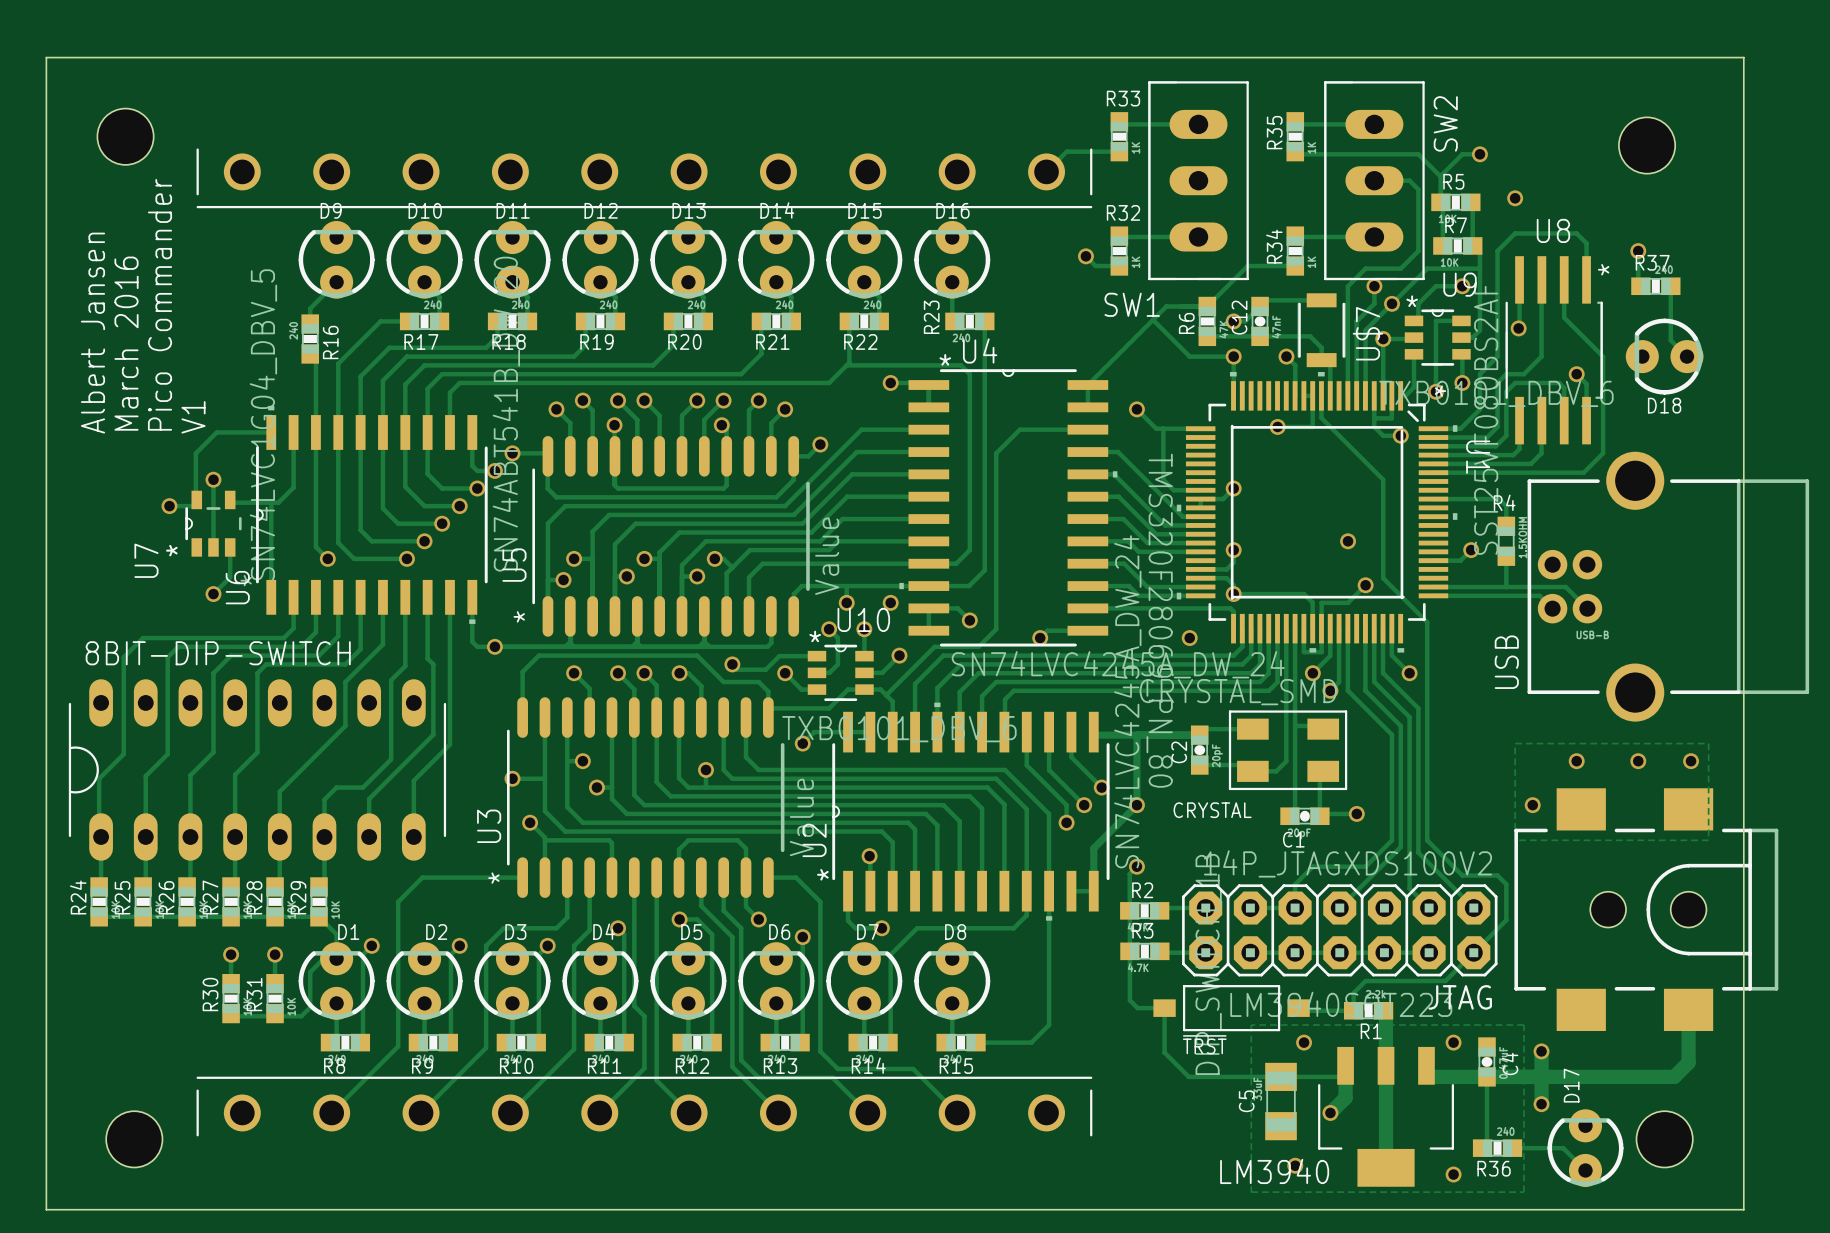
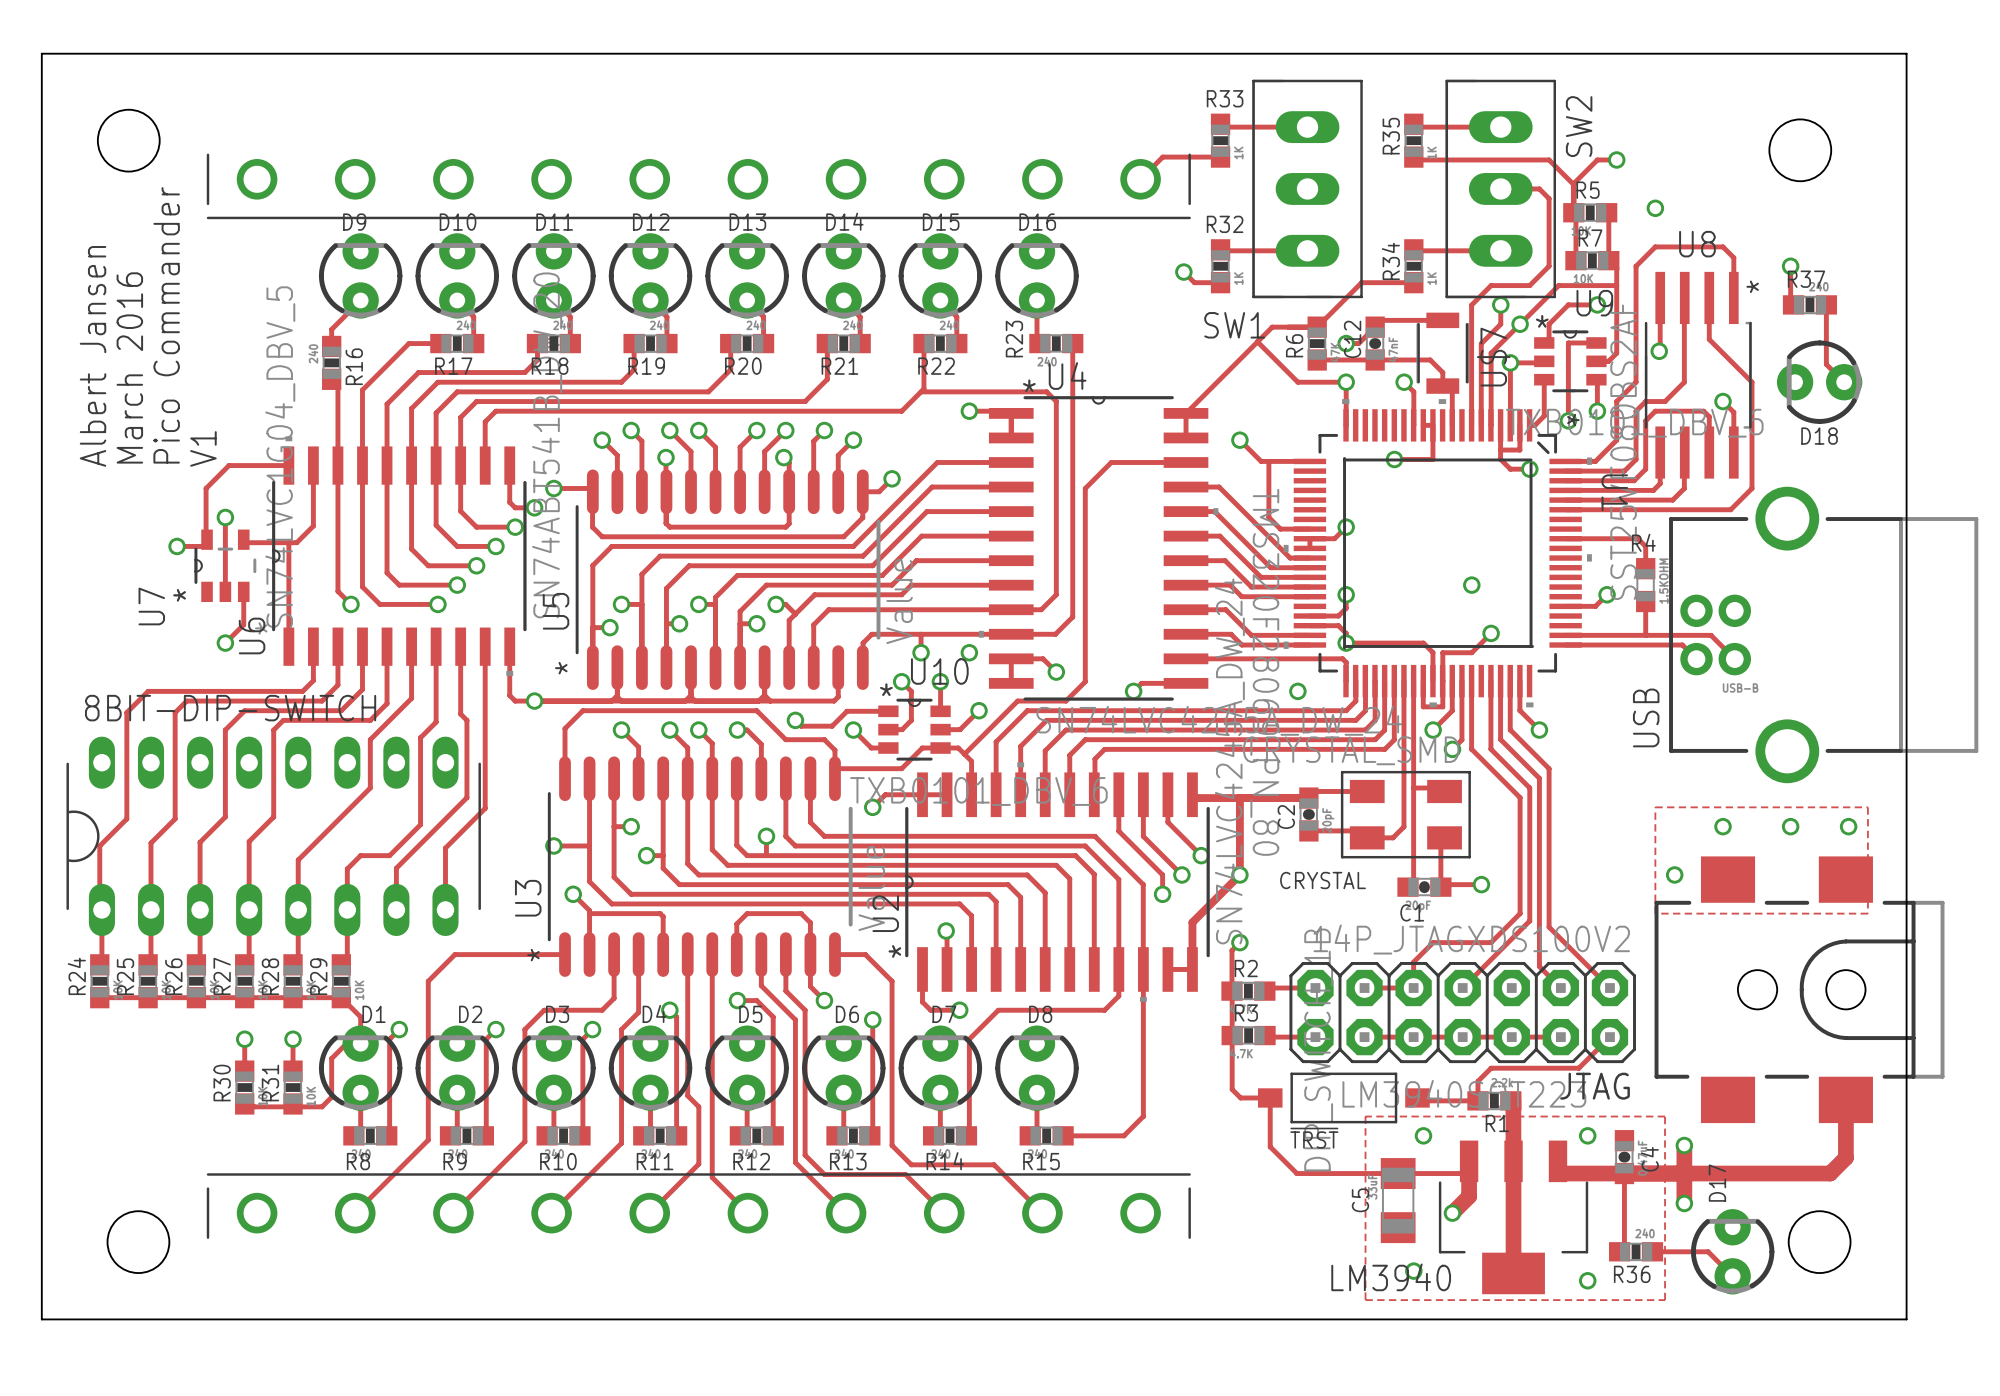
track: (1321, 395) (1321, 417) (1383, 479) (1383, 578) (1427, 622) (1427, 840) (1462, 875) (1497, 875) (1506, 884) (1506, 920) (1473, 952) -> none

